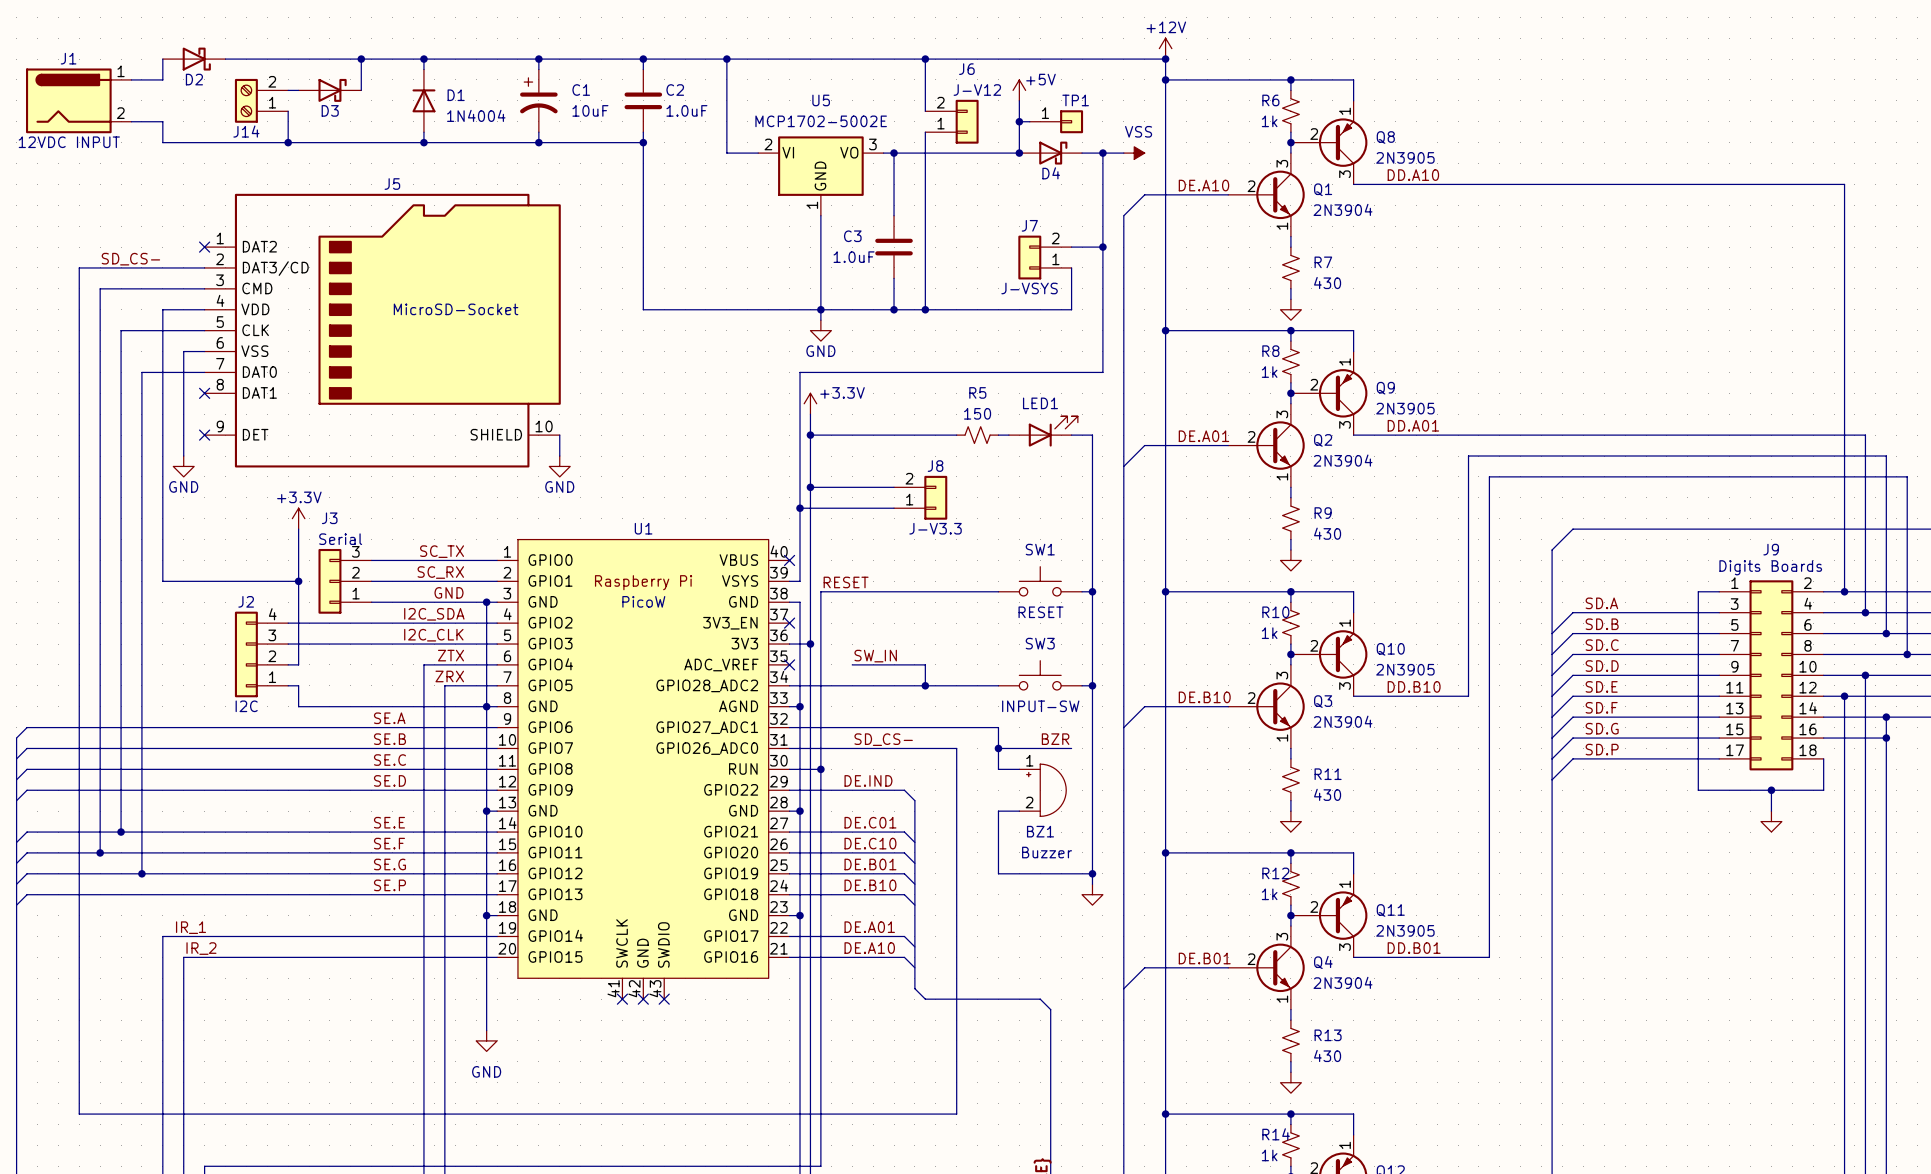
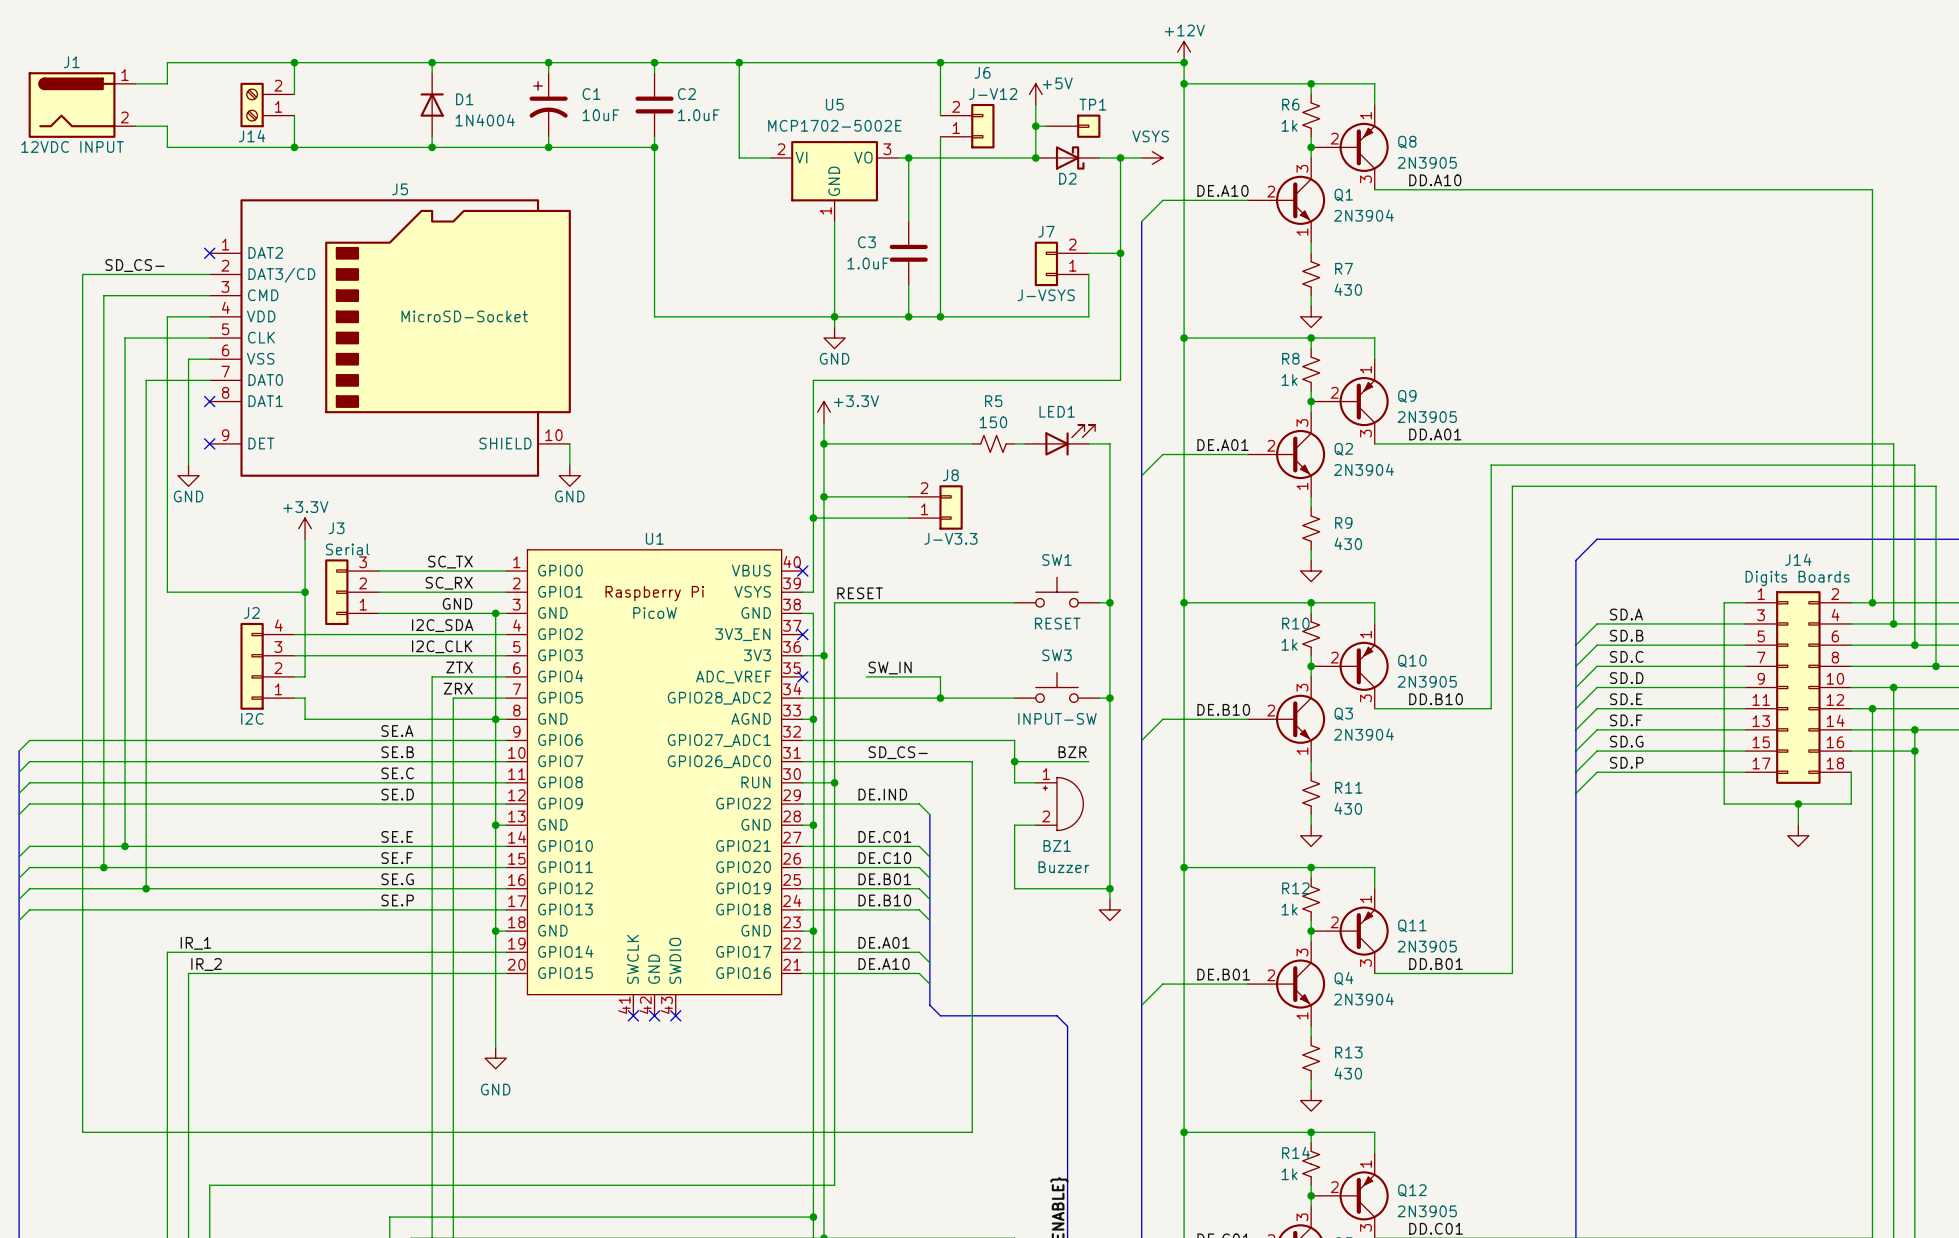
D2 position: (194, 59) -> (1067, 157)
junction: none -> (294, 62)
wire: (361, 59) (361, 90) -> none
junction: (361, 59) -> none
wire: (288, 90) (298, 90) -> (294, 94) (294, 62)
D3: (329, 90) -> none
TP1 pin number: 1 (1045, 113) -> none
D4: (1050, 153) -> none
power symbol: VSS (1134, 153) -> VSYS (1152, 157)
J9 name: J9 (1771, 549) -> J14 (1798, 559)

